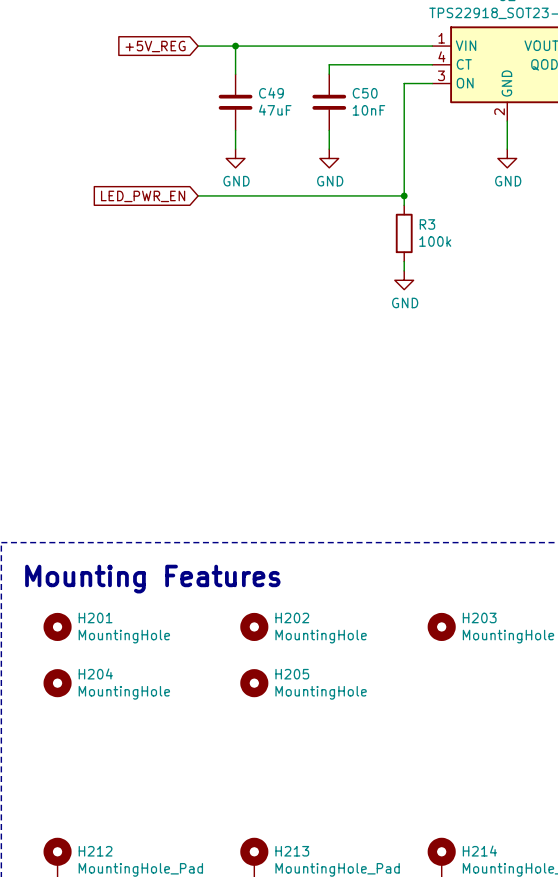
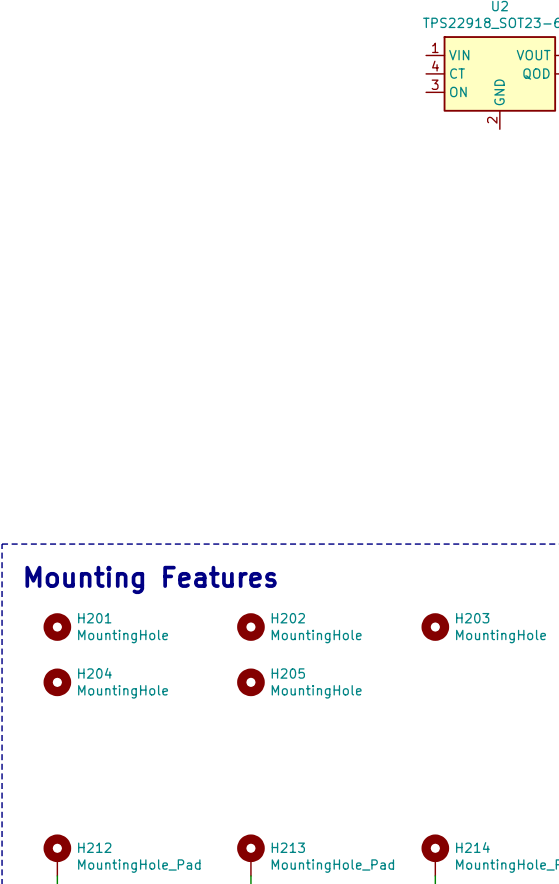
global label: +5V_REG (155, 46) -> none
wire: (198, 46) (432, 46) -> none
wire: (235, 46) (235, 74) -> none
junction: (235, 46) -> none
wire: (432, 64) (329, 64) (329, 74) -> none
wire: (432, 83) (404, 83) (404, 205) -> none
C49: 47uF (235, 102) -> none
C50: 10nF (329, 102) -> none
wire: (507, 121) (507, 149) -> none
wire: (235, 130) (235, 149) -> none
wire: (329, 130) (329, 149) -> none
power symbol: GND (235, 158) -> none
power symbol: GND (329, 158) -> none
power symbol: GND (507, 158) -> none
wire: (198, 195) (404, 195) -> none
junction: (404, 195) -> none
global label: LED_PWR_EN (143, 196) -> none
R3: 100k (404, 233) -> none
wire: (404, 261) (404, 270) -> none
power symbol: GND (404, 280) -> none

